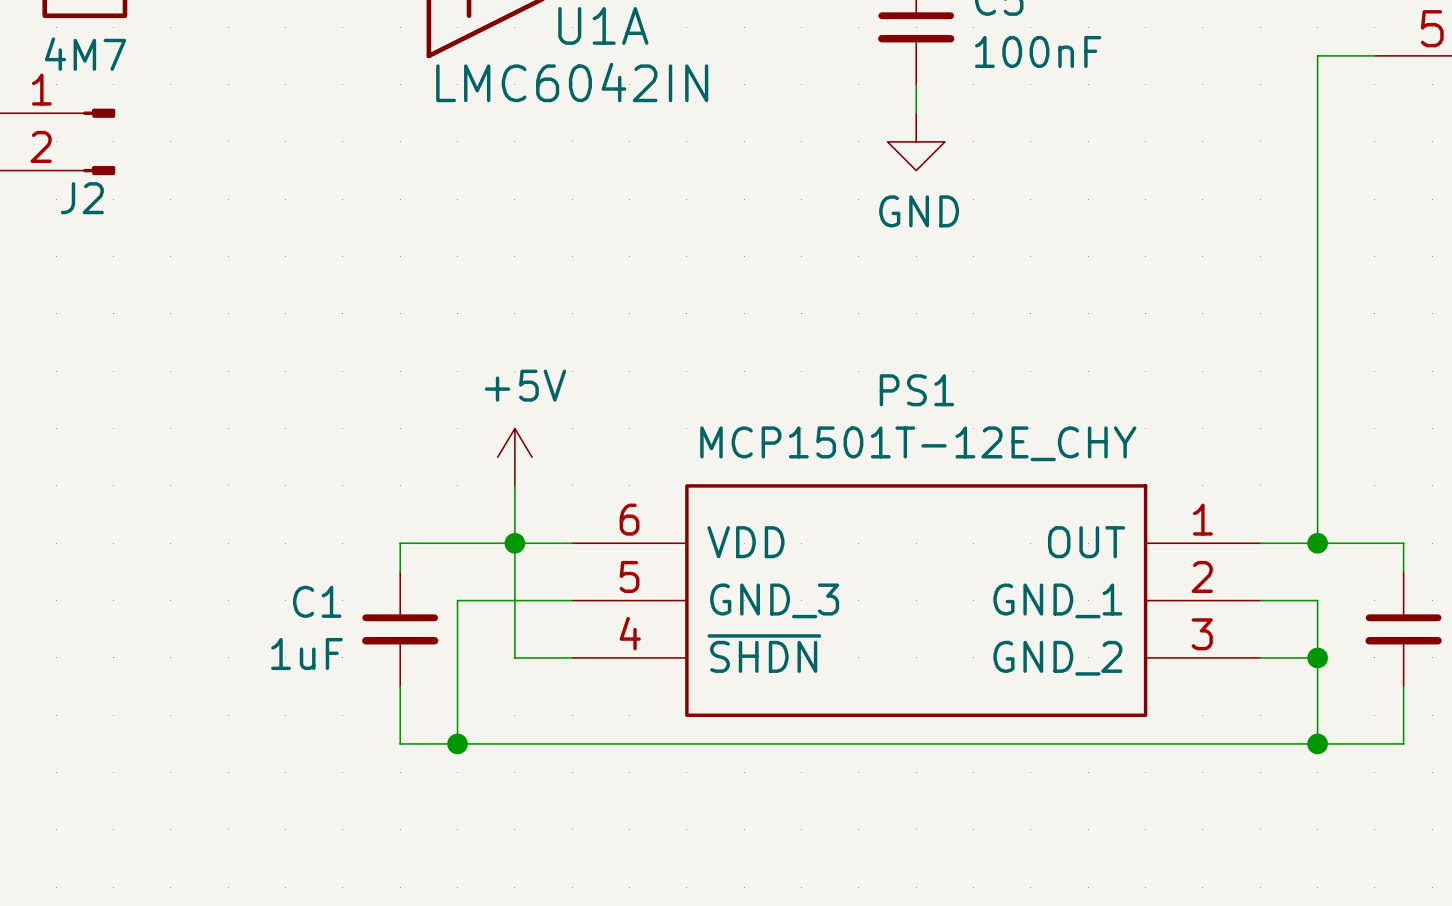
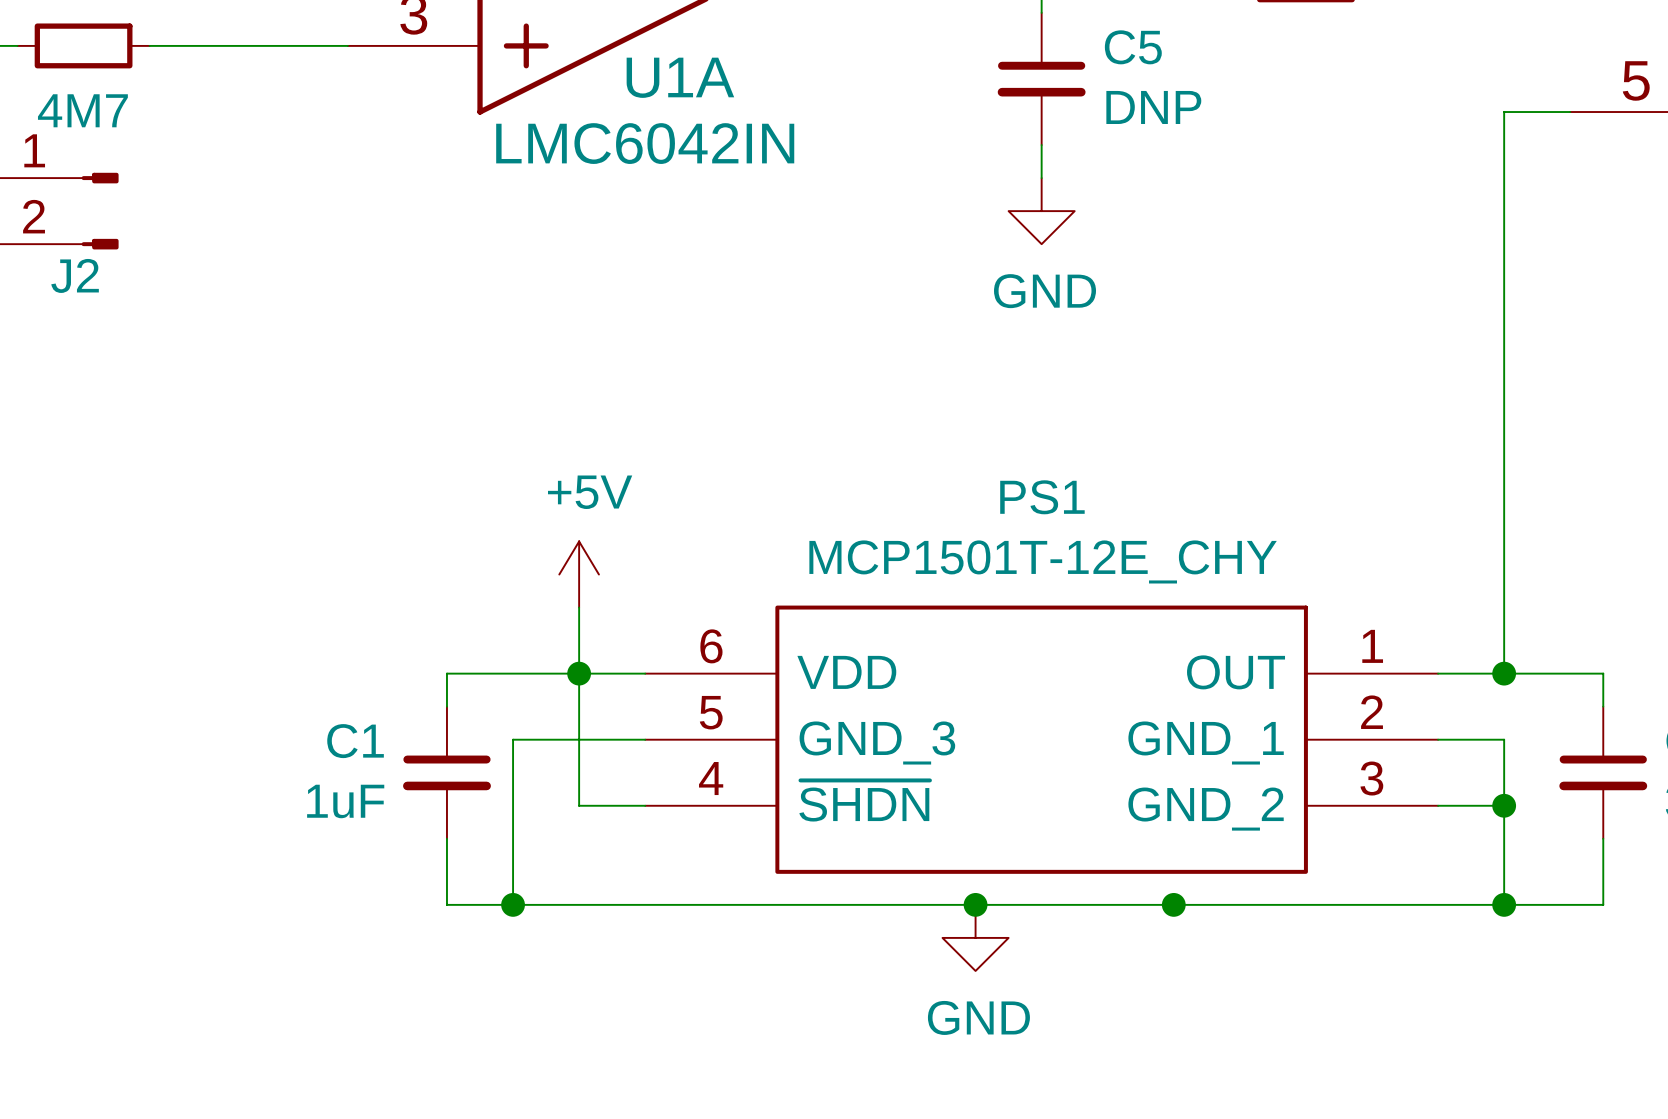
C5 value: 100nF (1038, 51) -> DNP (1153, 107)
junction: none -> (975, 904)
junction: none -> (1173, 904)
power symbol: none -> GND (975, 937)

